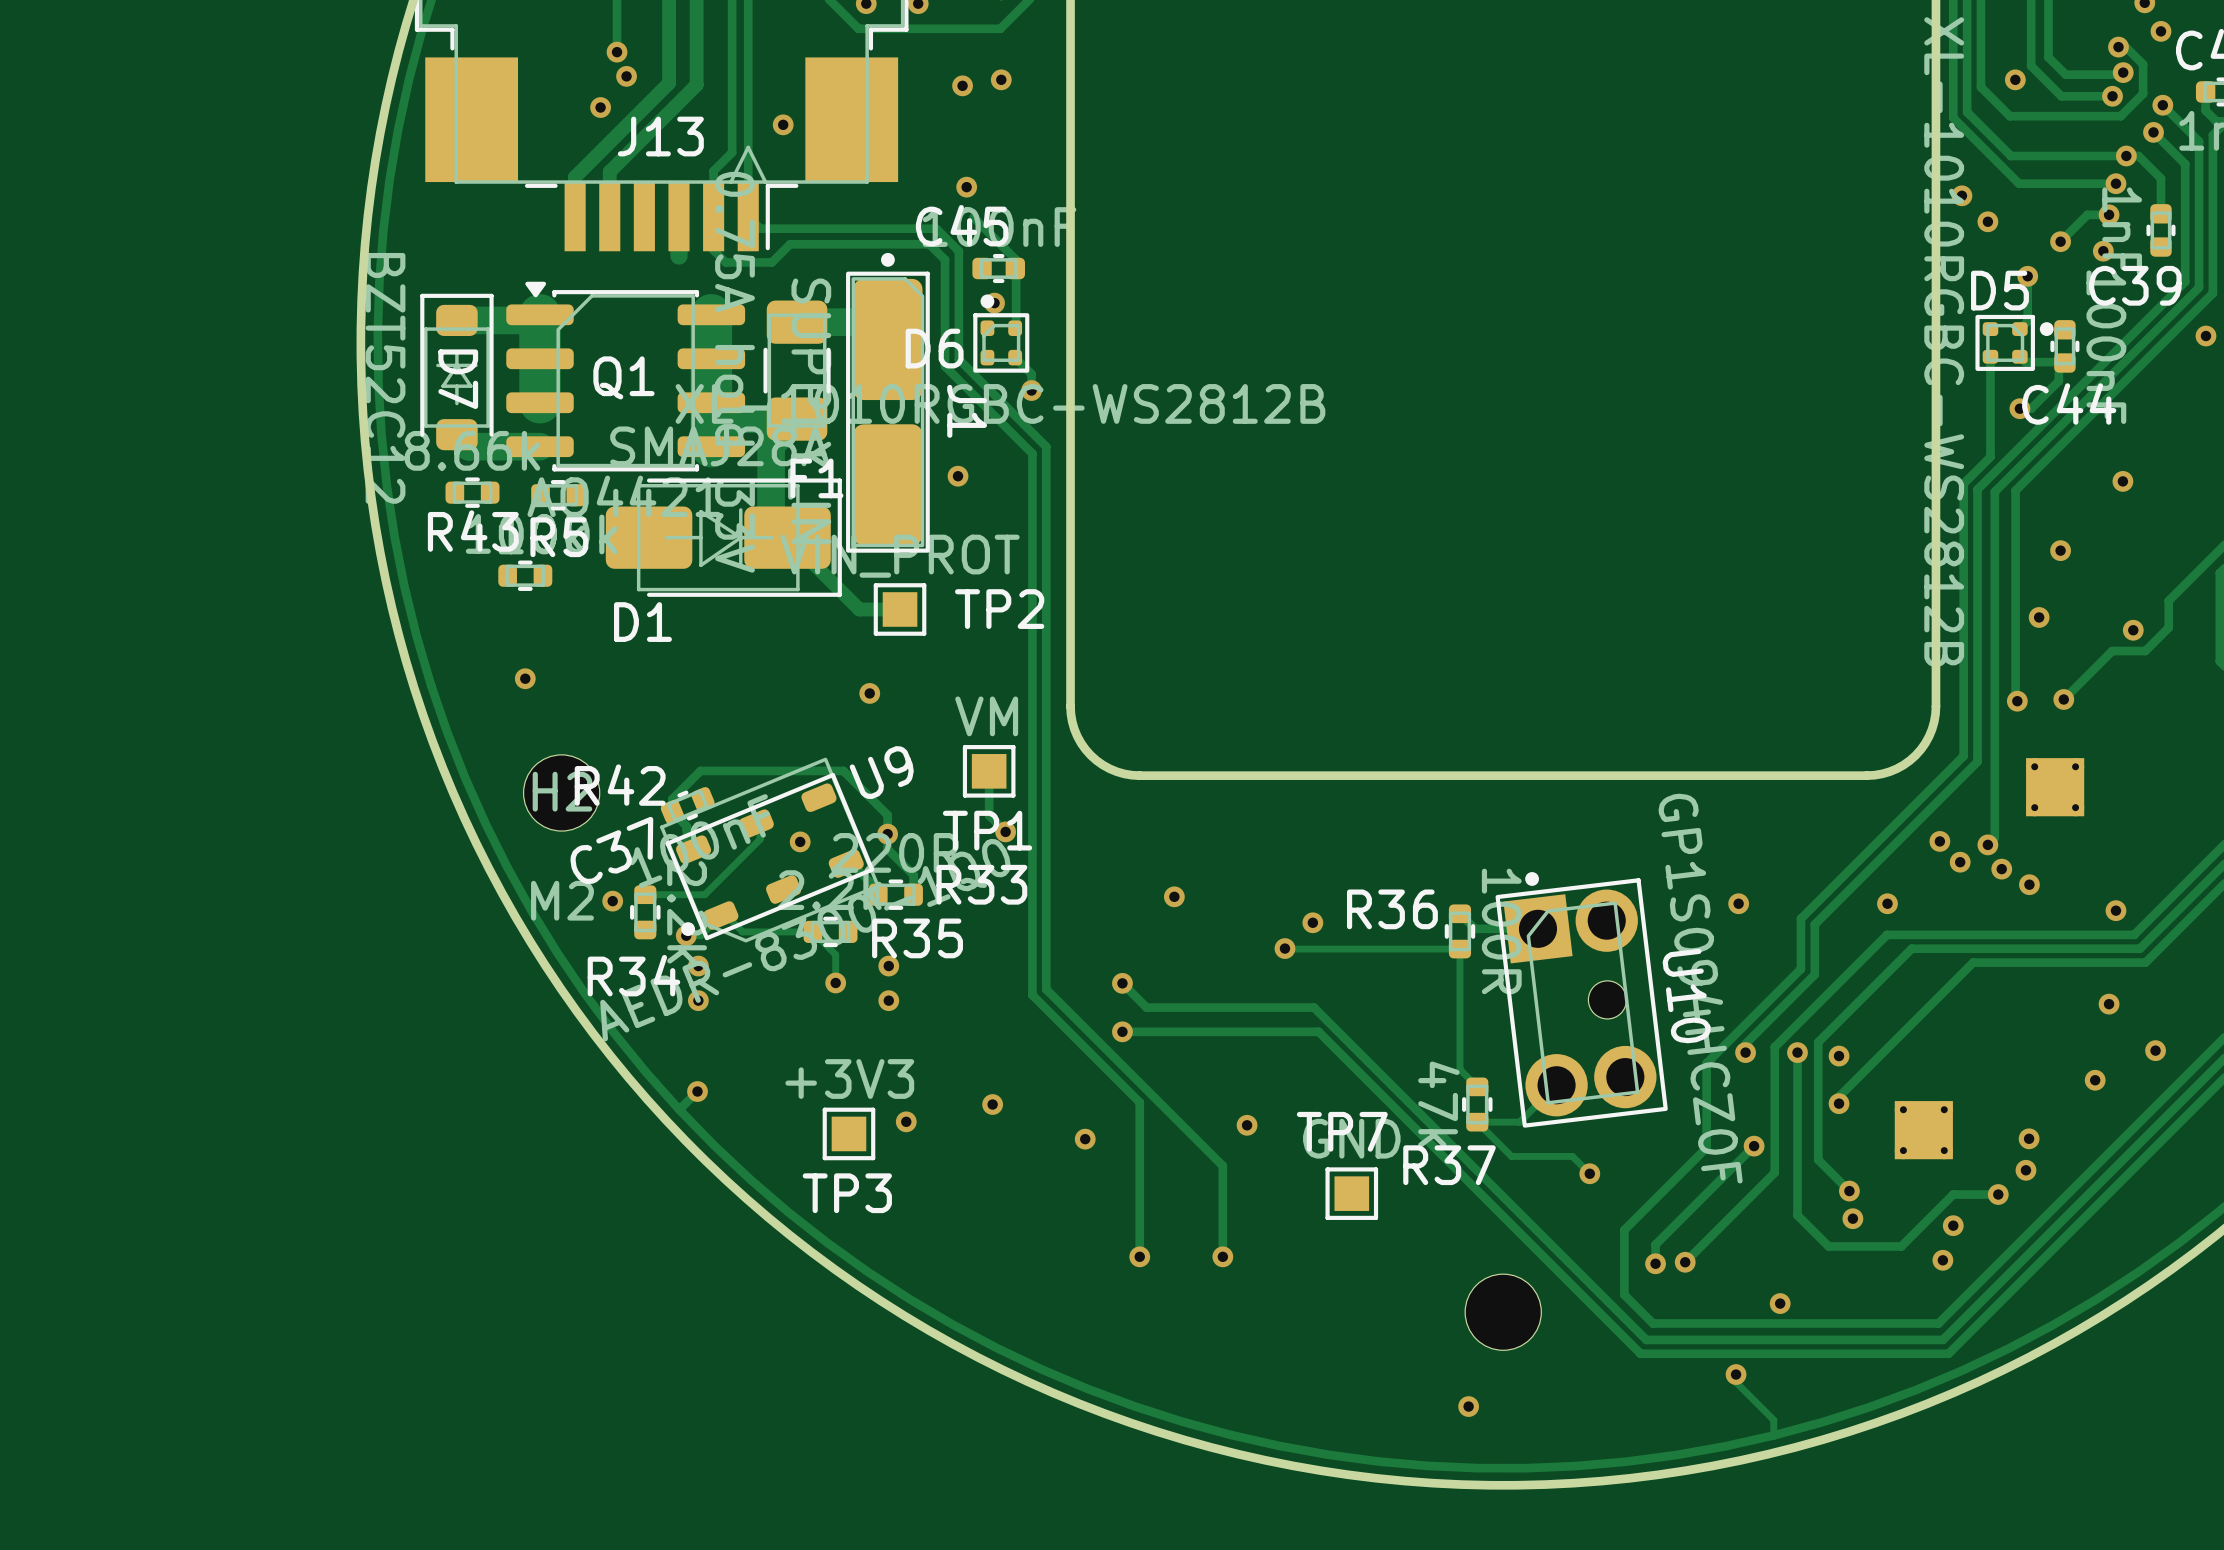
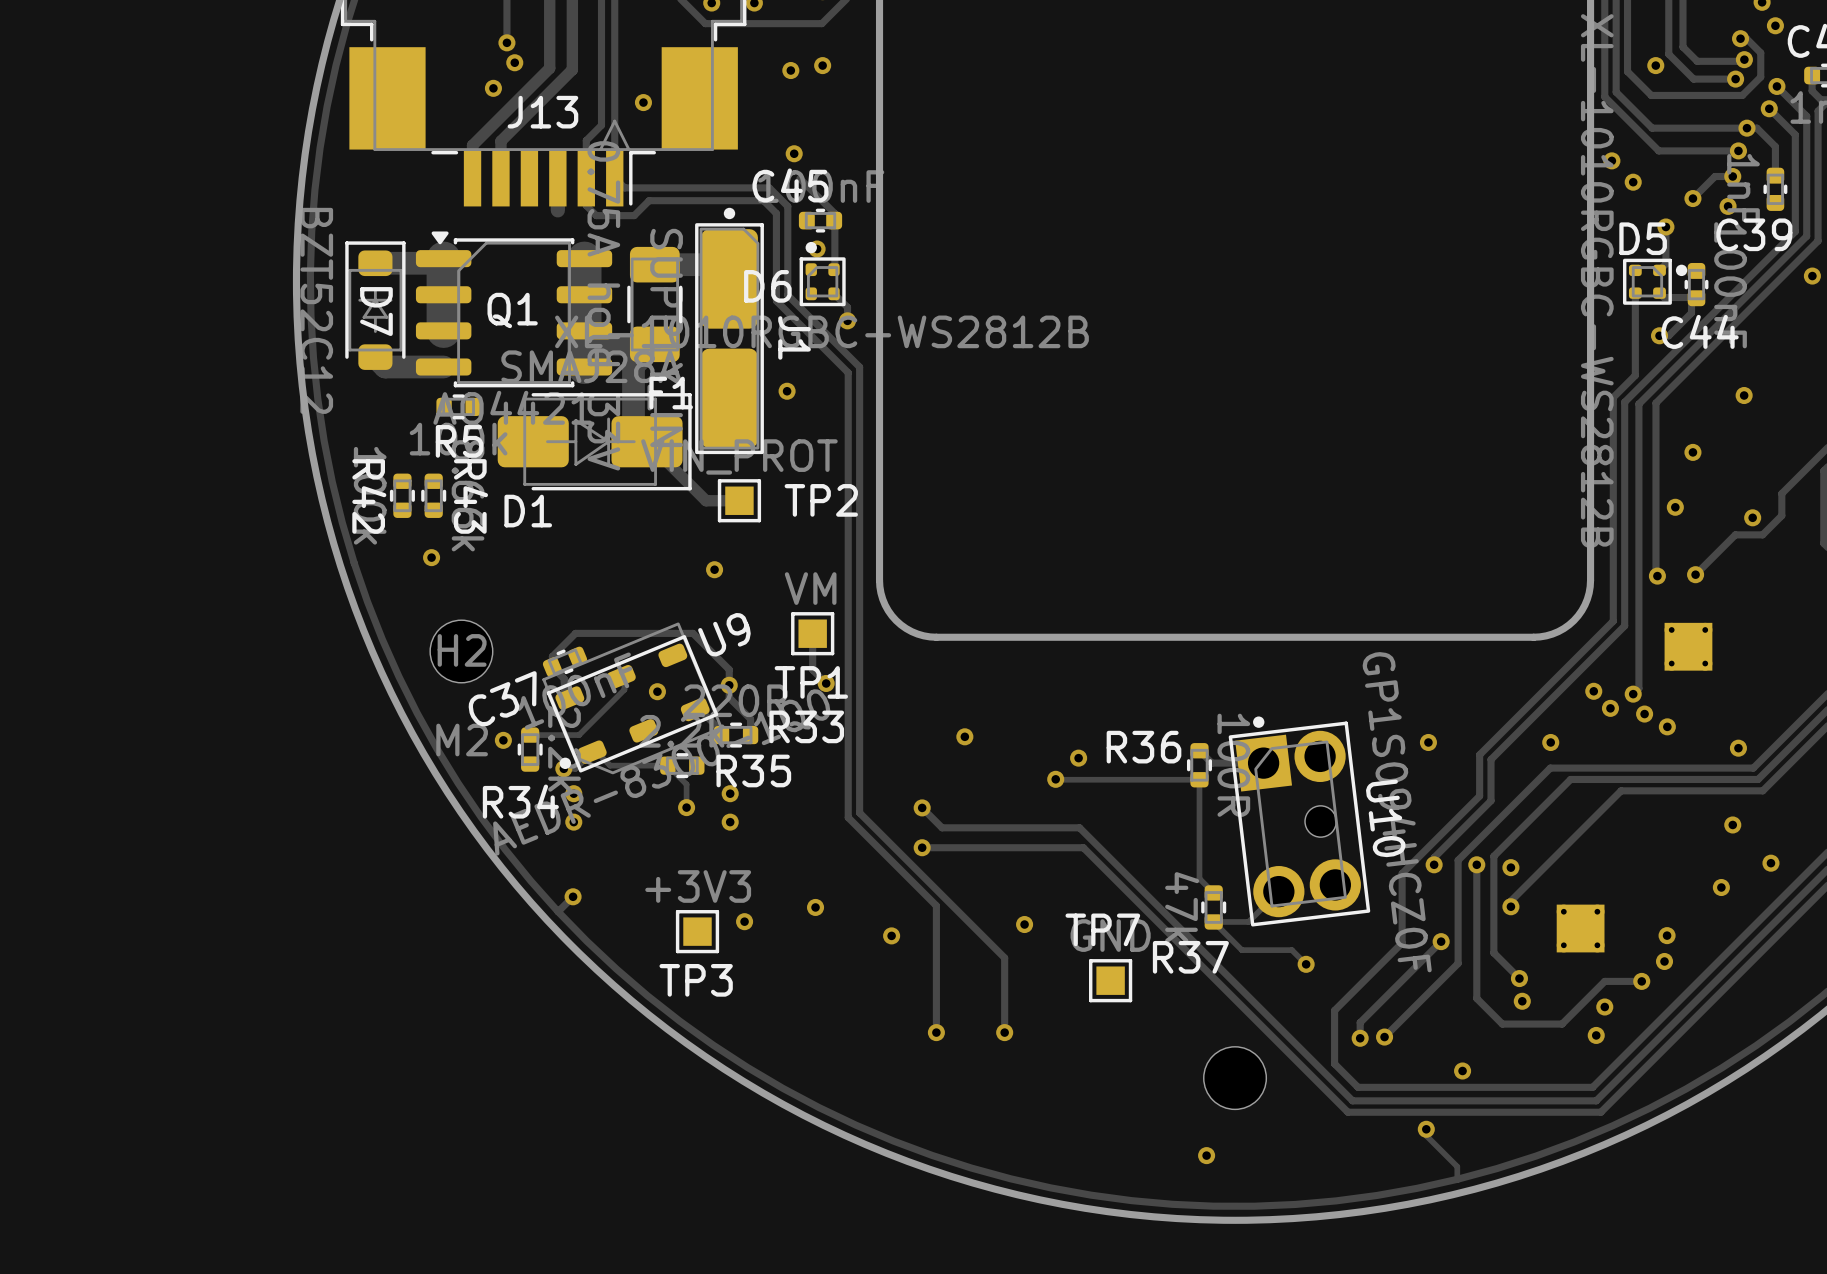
R43 rotation: 0° (472, 492) -> 90° clockwise (433, 495)
R43 position: (472, 492) -> (433, 495)
R42 rotation: 0° (525, 575) -> 90° clockwise (402, 495)
R42 position: (525, 575) -> (402, 495)
R42 name position: R42 (620, 785) -> R42 (369, 496)

